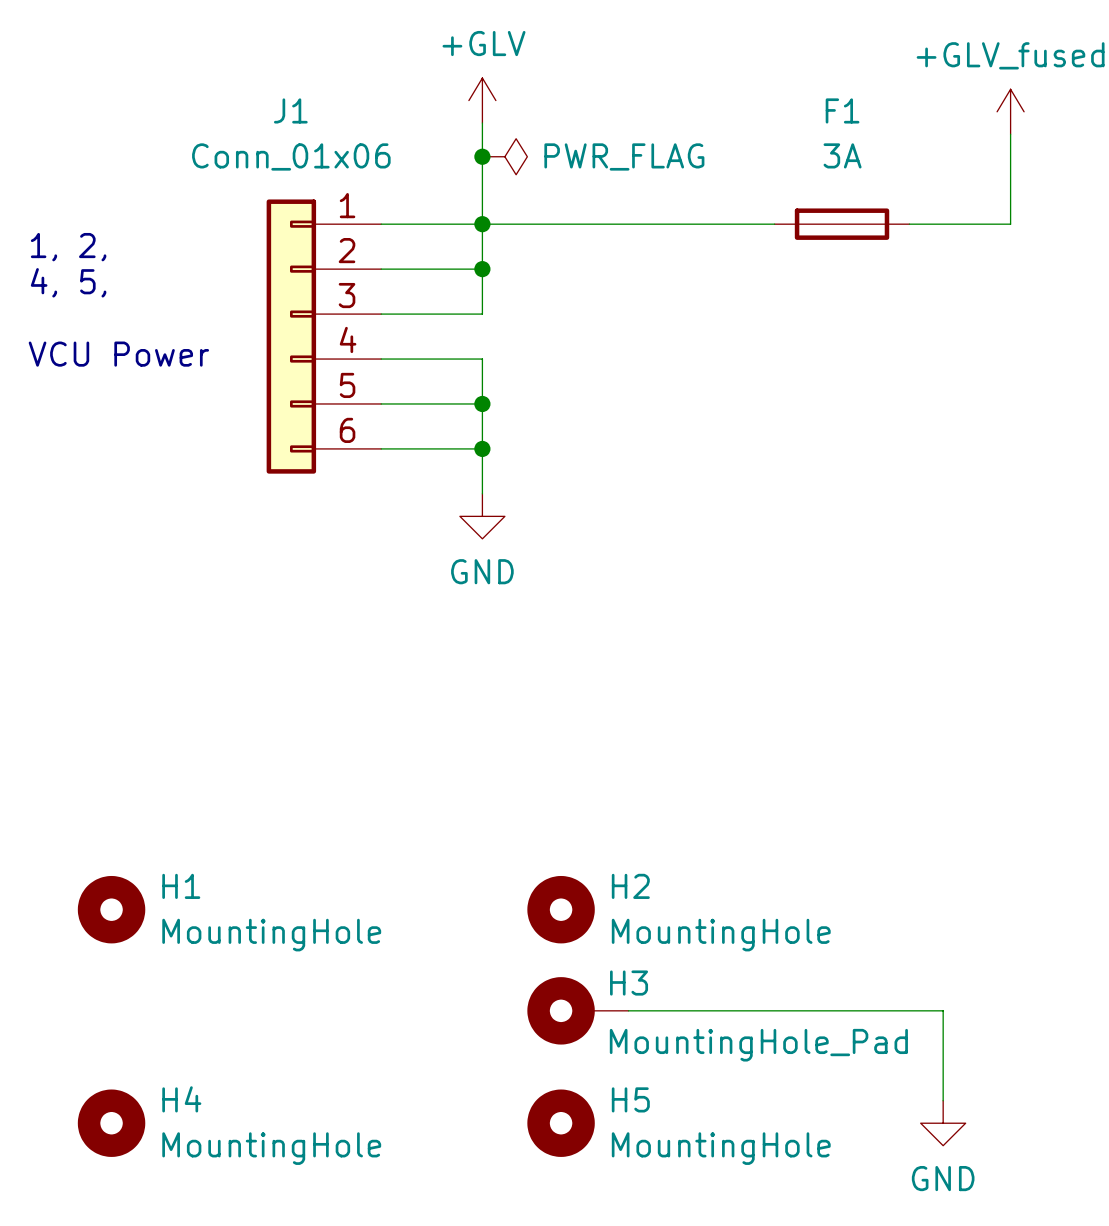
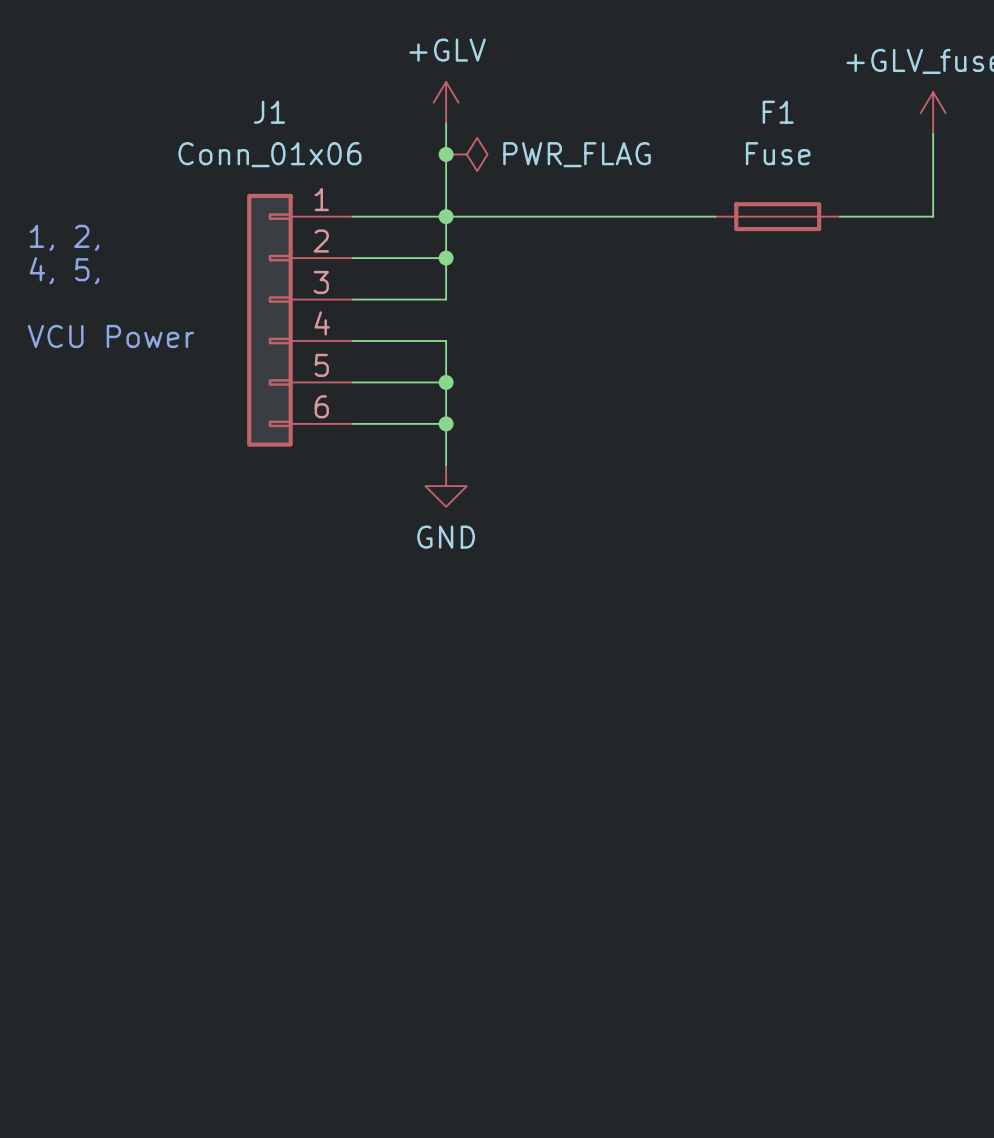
F1 value: 3A (842, 155) -> Fuse (778, 153)
H1: MountingHole (111, 909) -> none
H2: MountingHole (561, 909) -> none
H3: MountingHole_Pad (577, 1010) -> none
wire: (628, 1010) (943, 1010) (943, 1100) -> none
H4: MountingHole (111, 1123) -> none
H5: MountingHole (561, 1123) -> none
power symbol: GND (943, 1123) -> none

